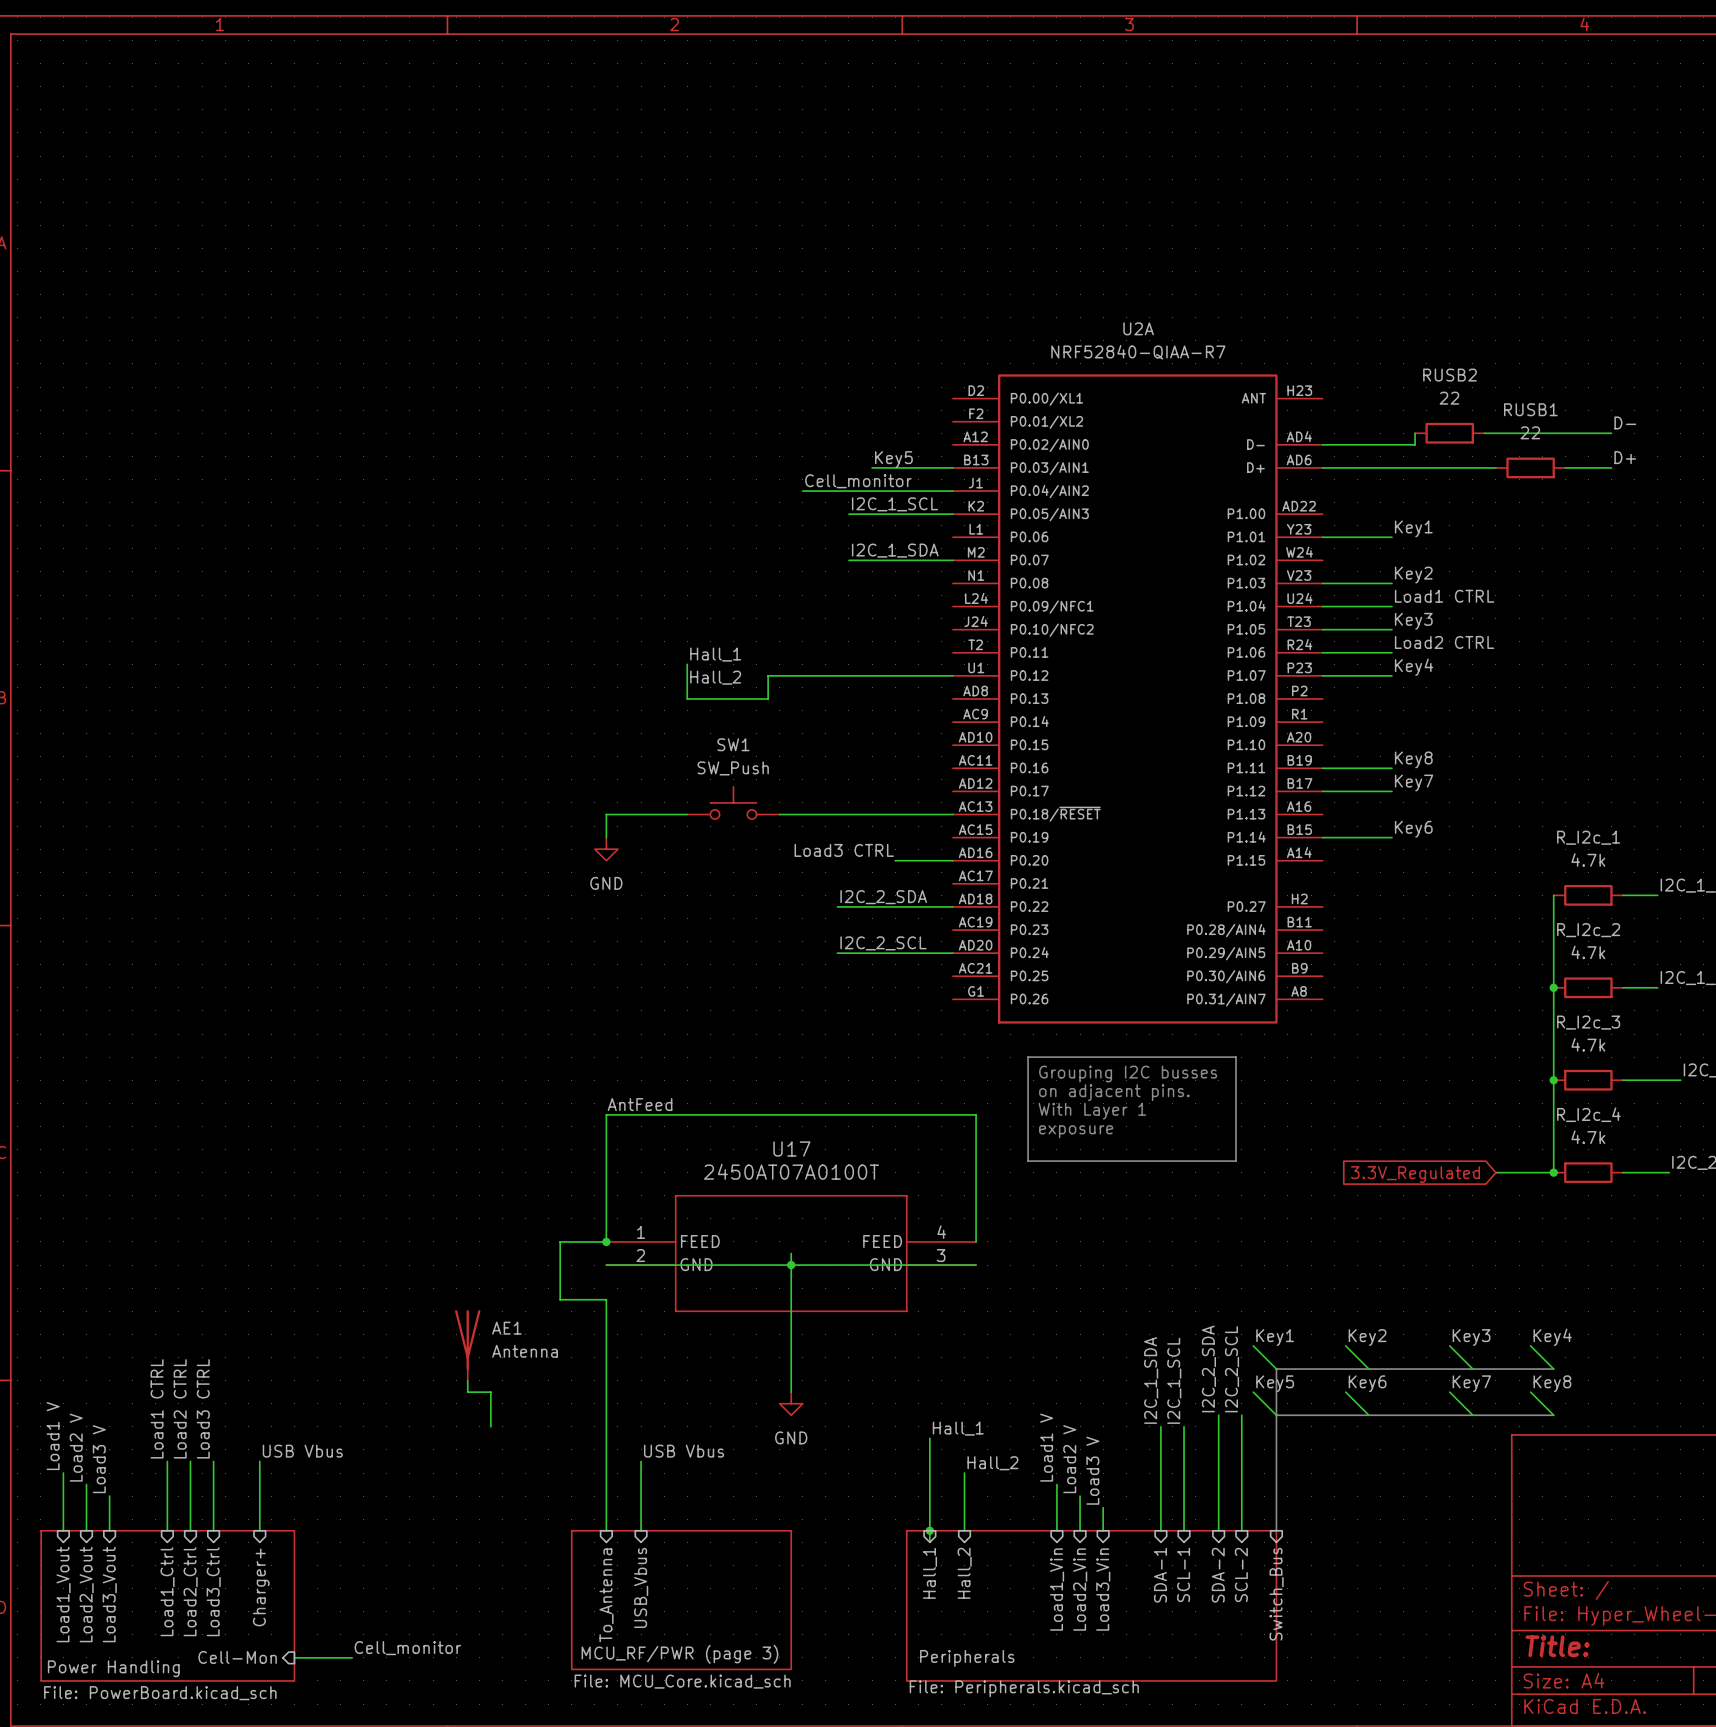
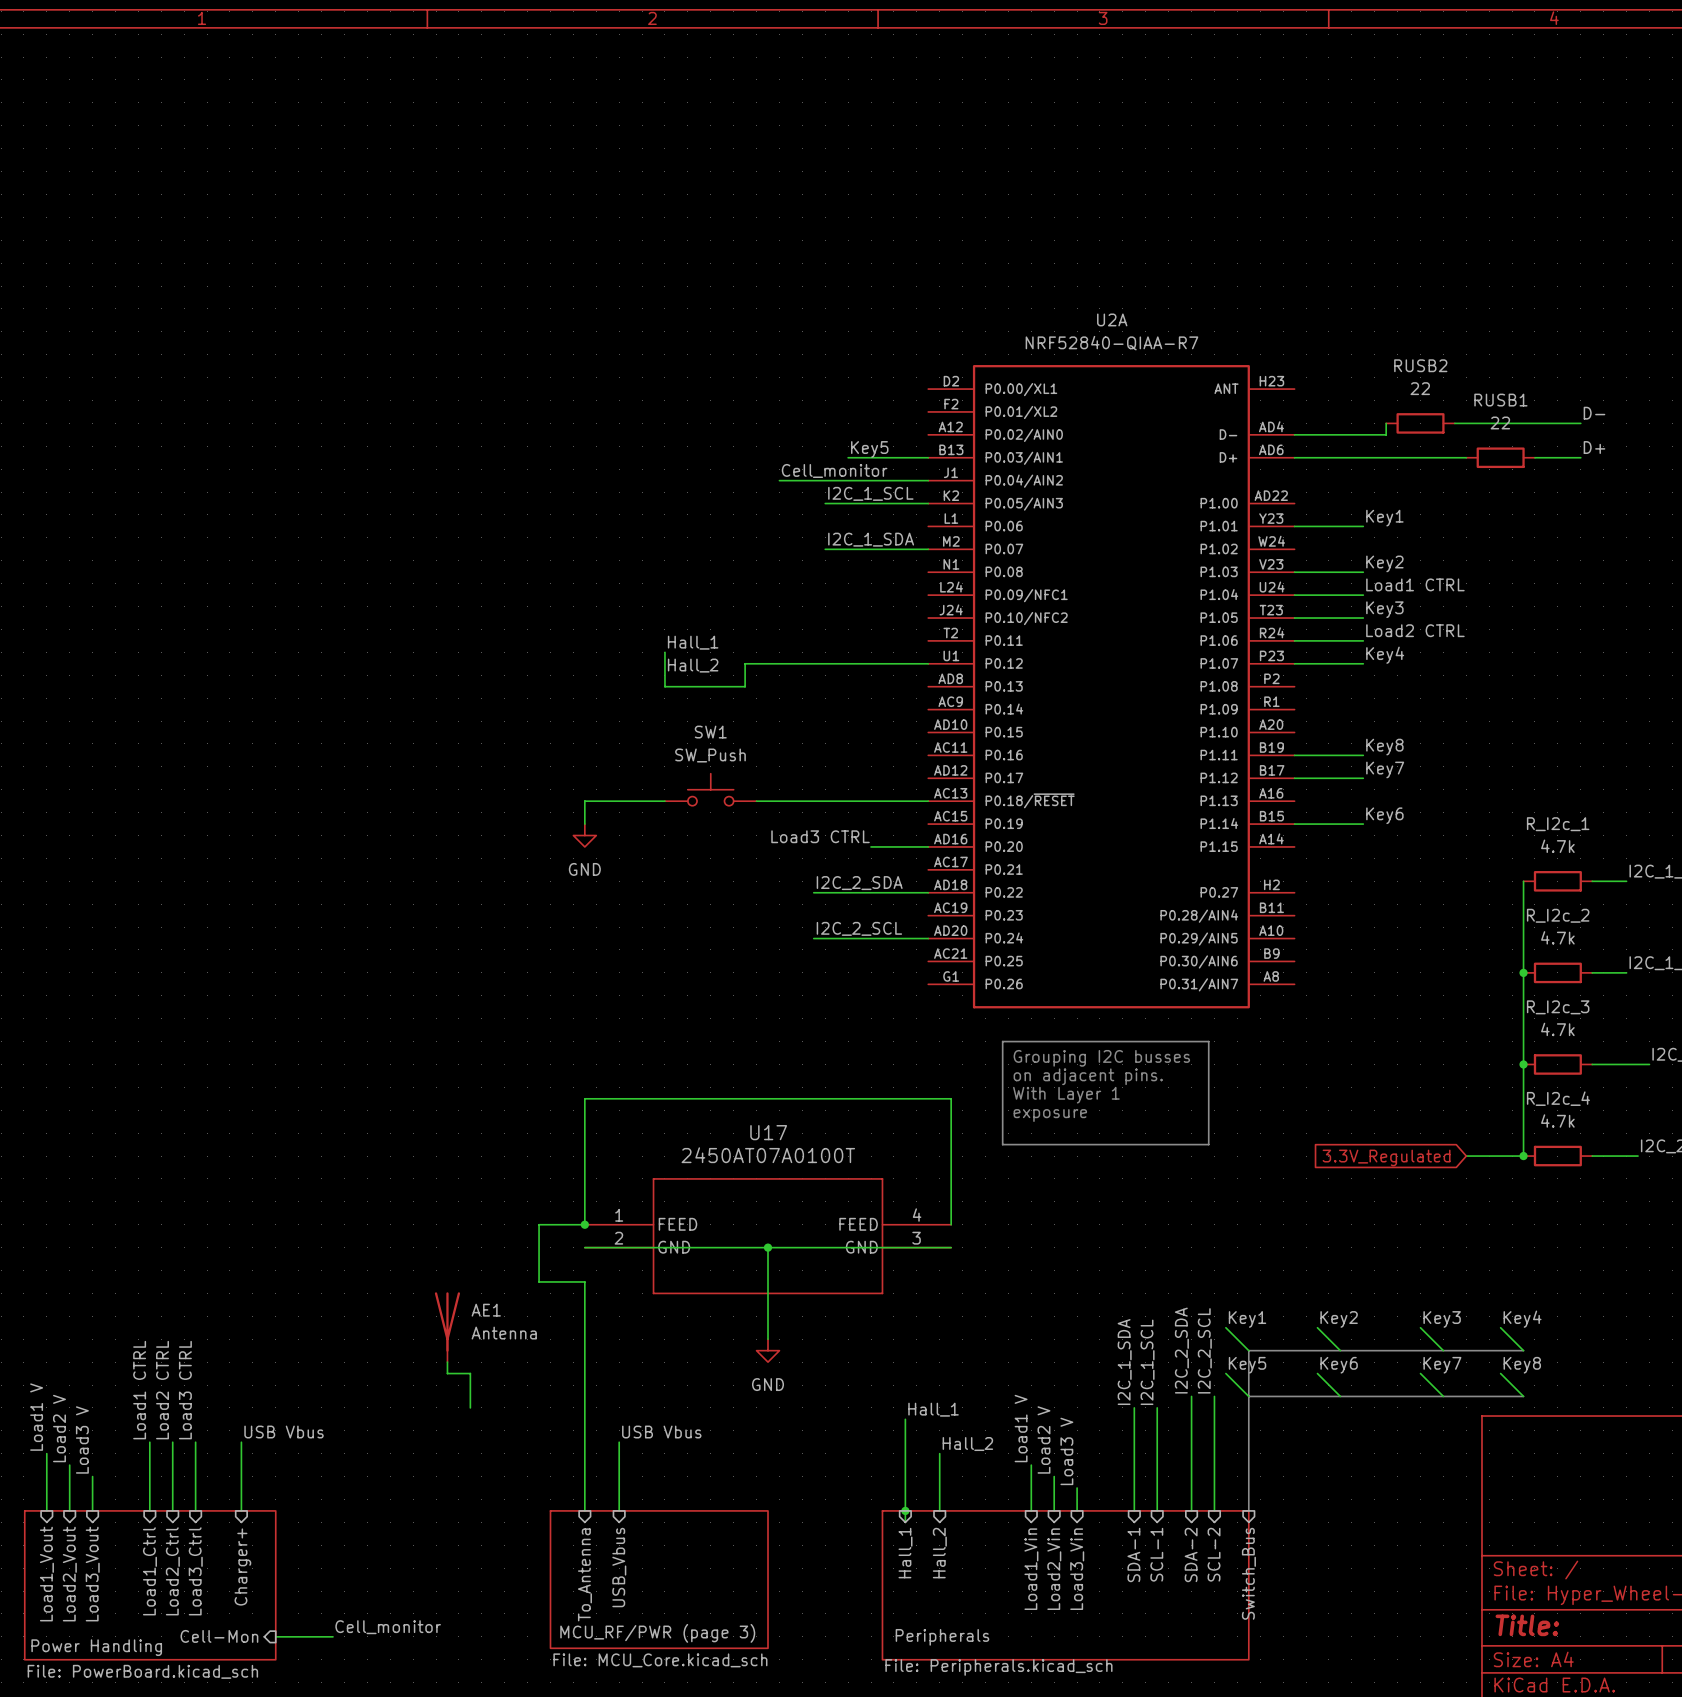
label: AntFeed (640, 1104) -> none
wire: (791, 1253) (791, 1265) -> none
wire: (791, 1357) (791, 1392) -> none
power symbol position: GND (791, 1403) -> GND (768, 1350)

